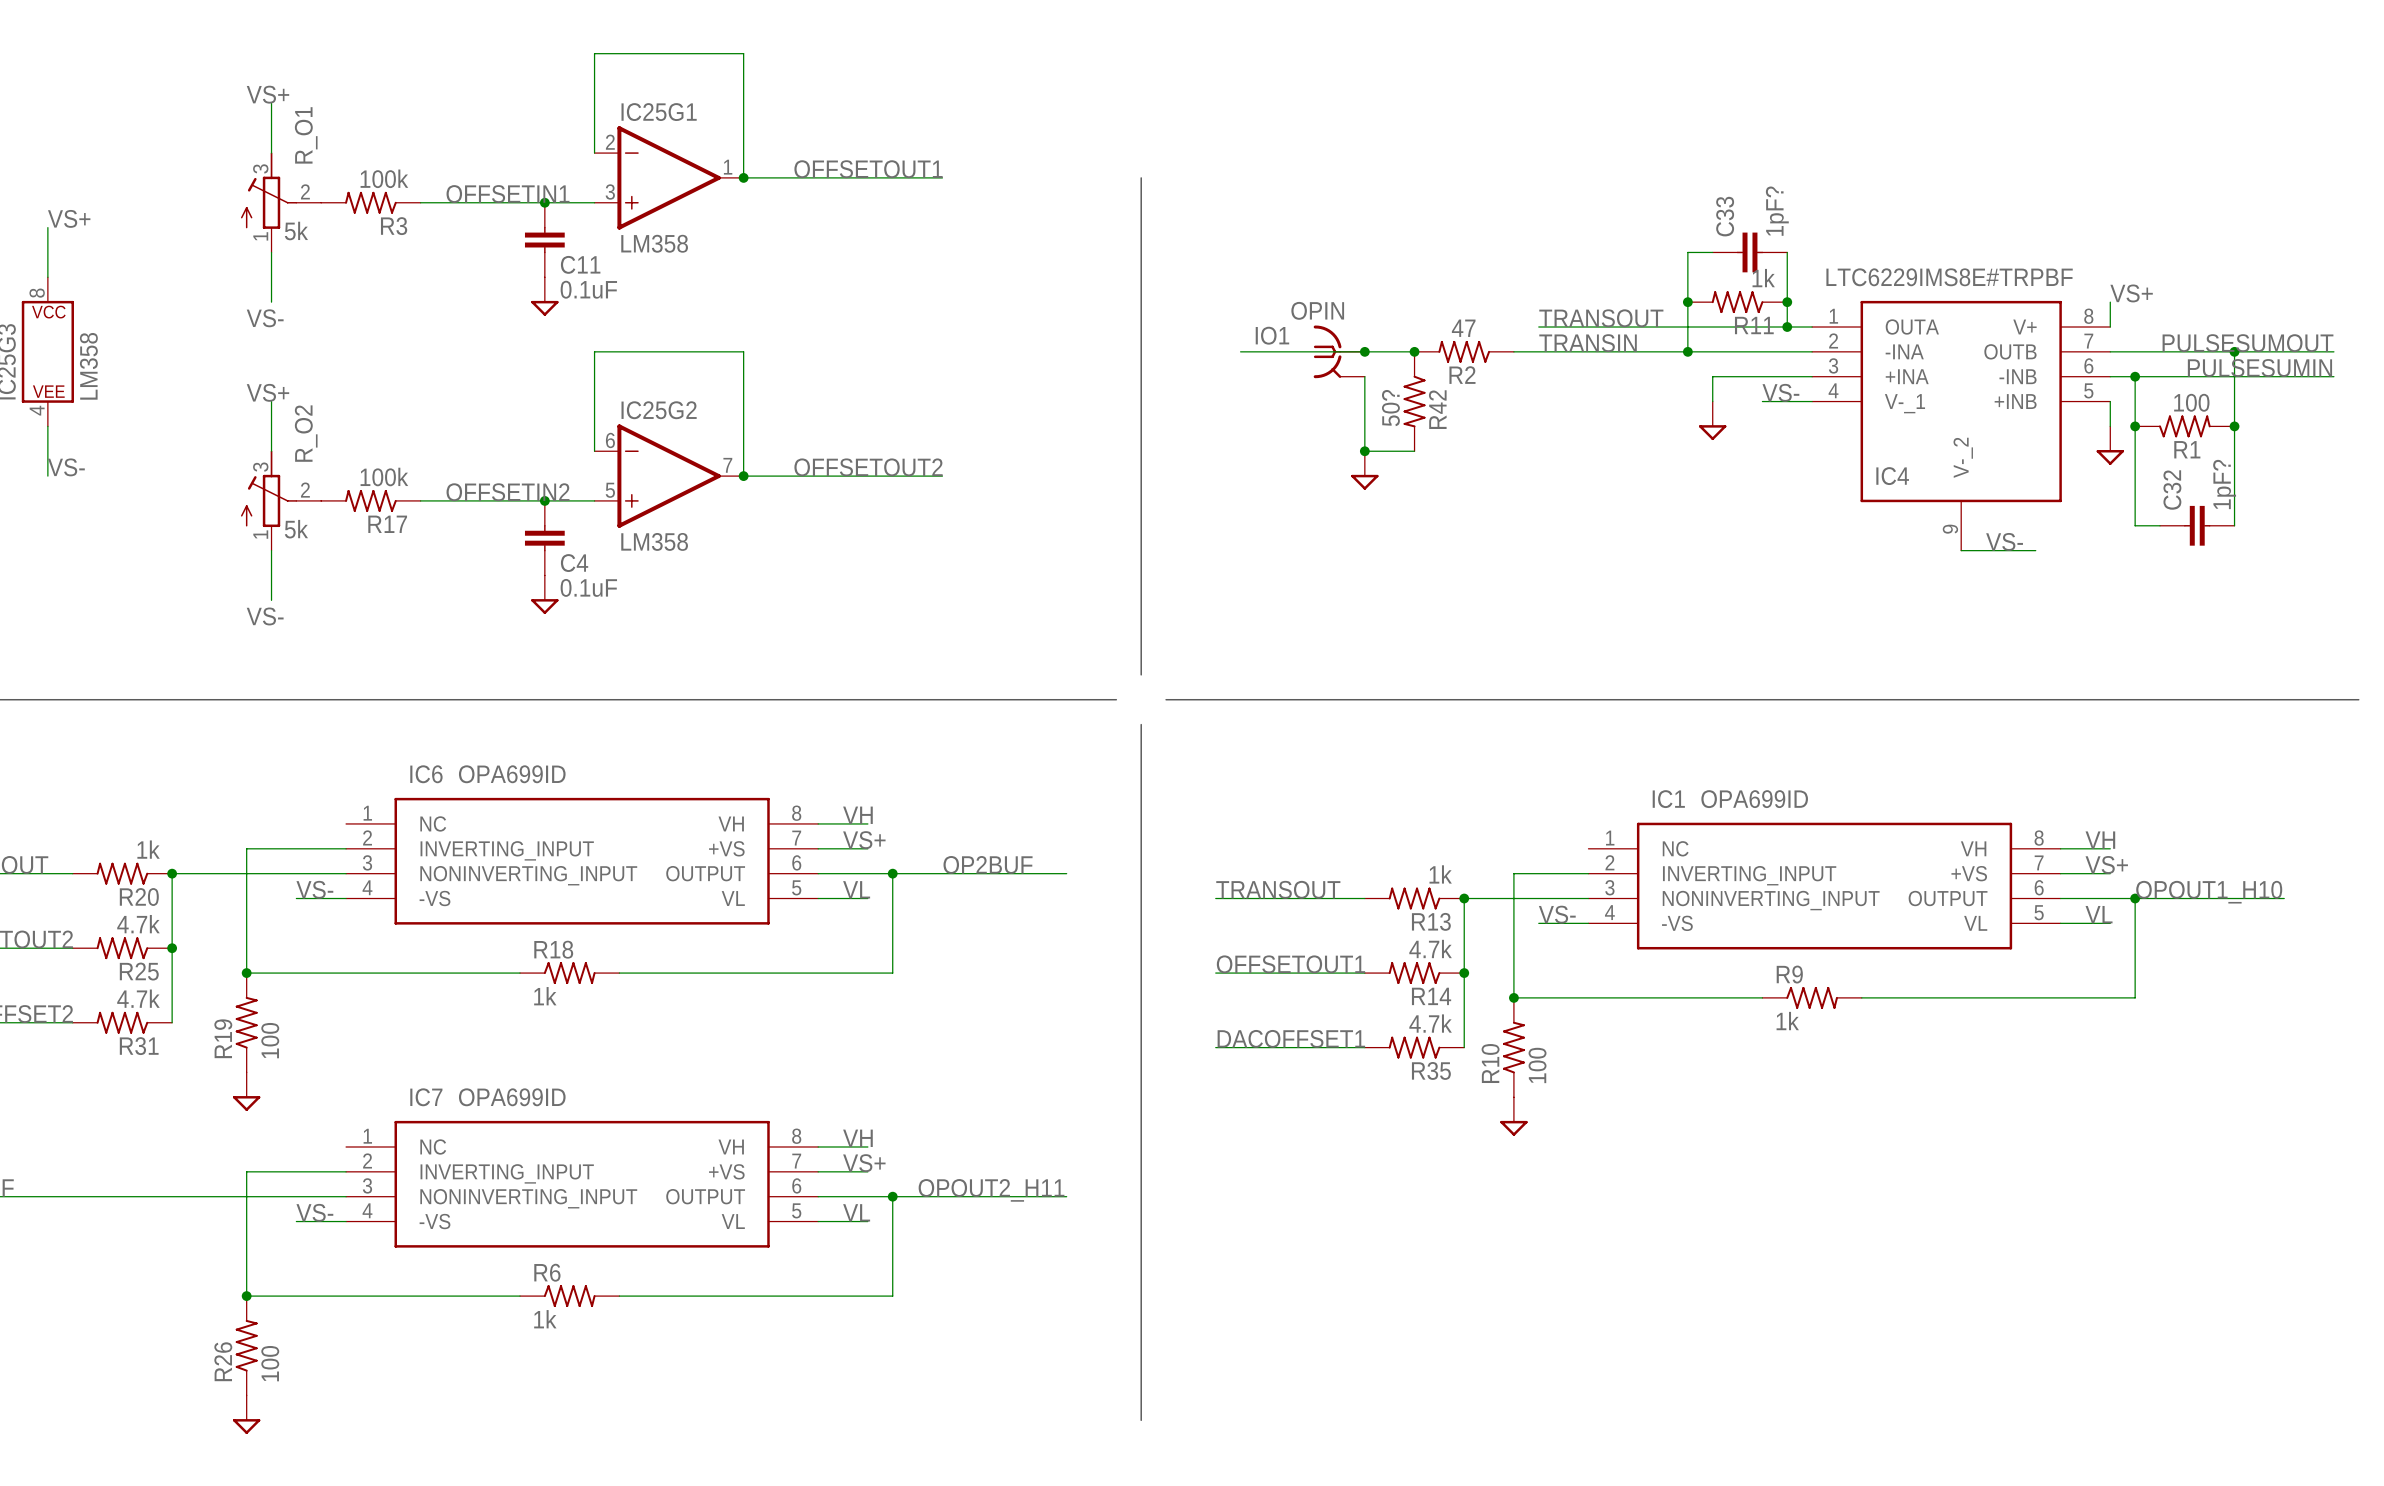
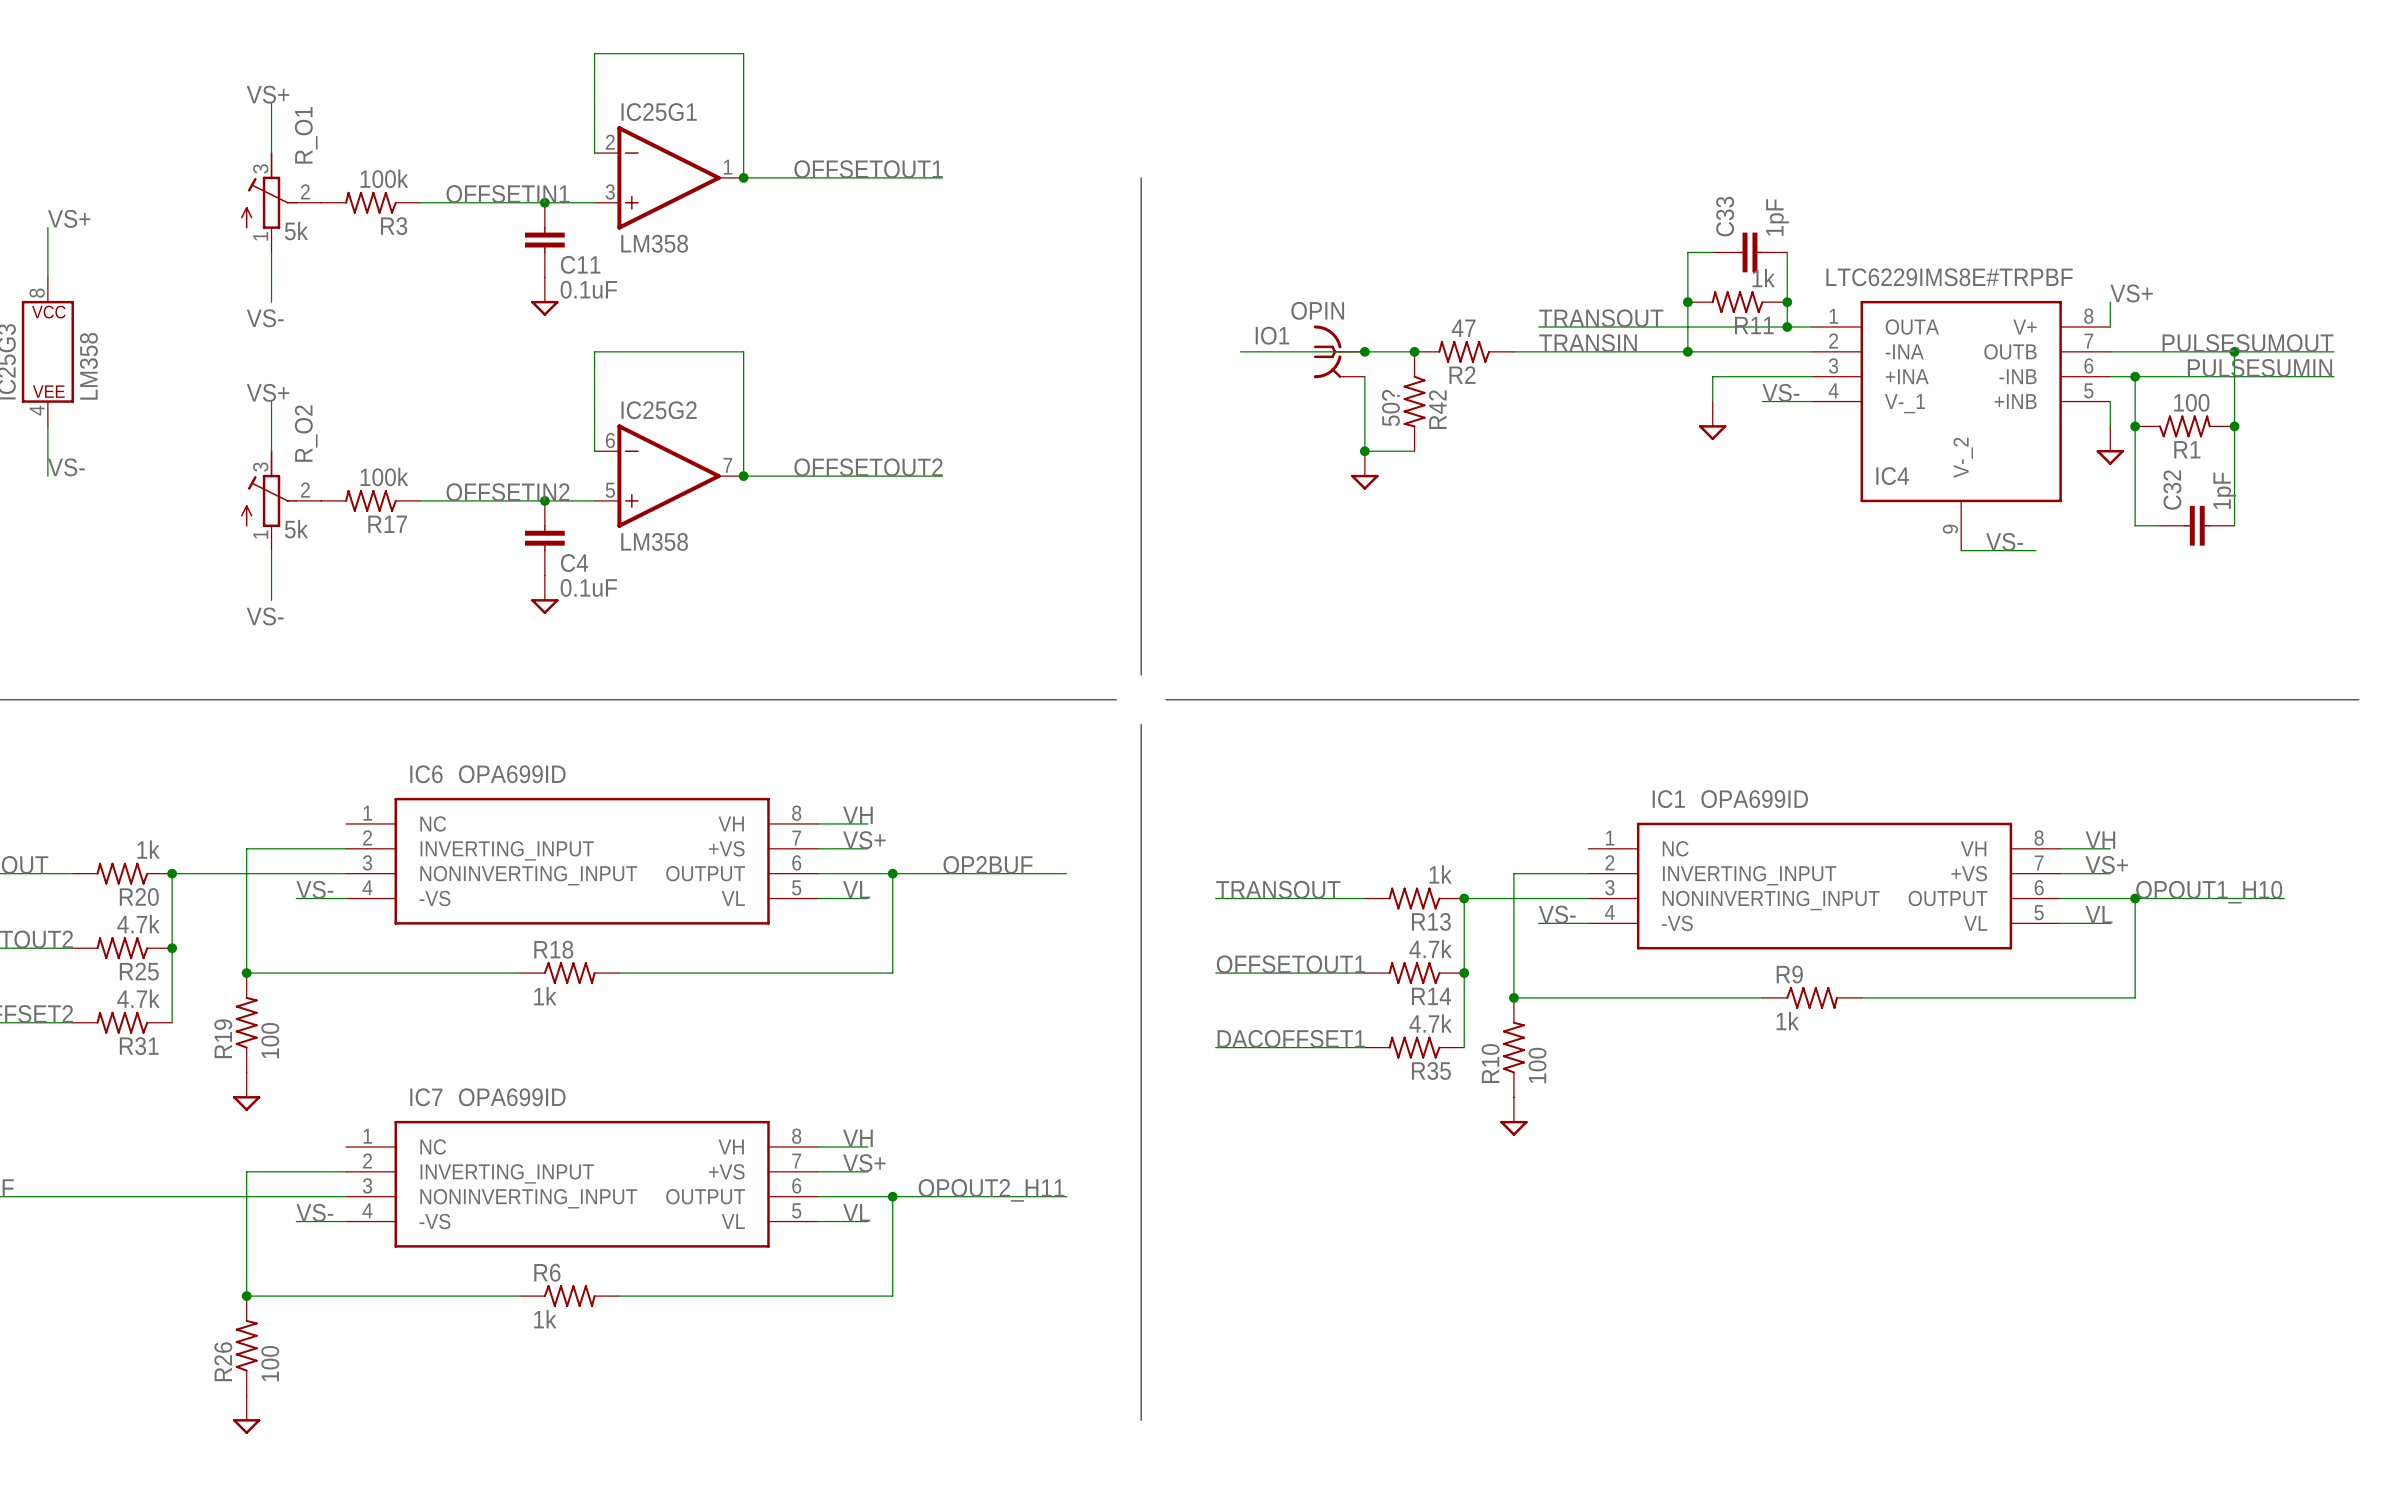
C33 value: 1pF? (1777, 211) -> 1pF (1777, 217)
C32 value: 1pF? (2224, 484) -> 1pF (2224, 490)

